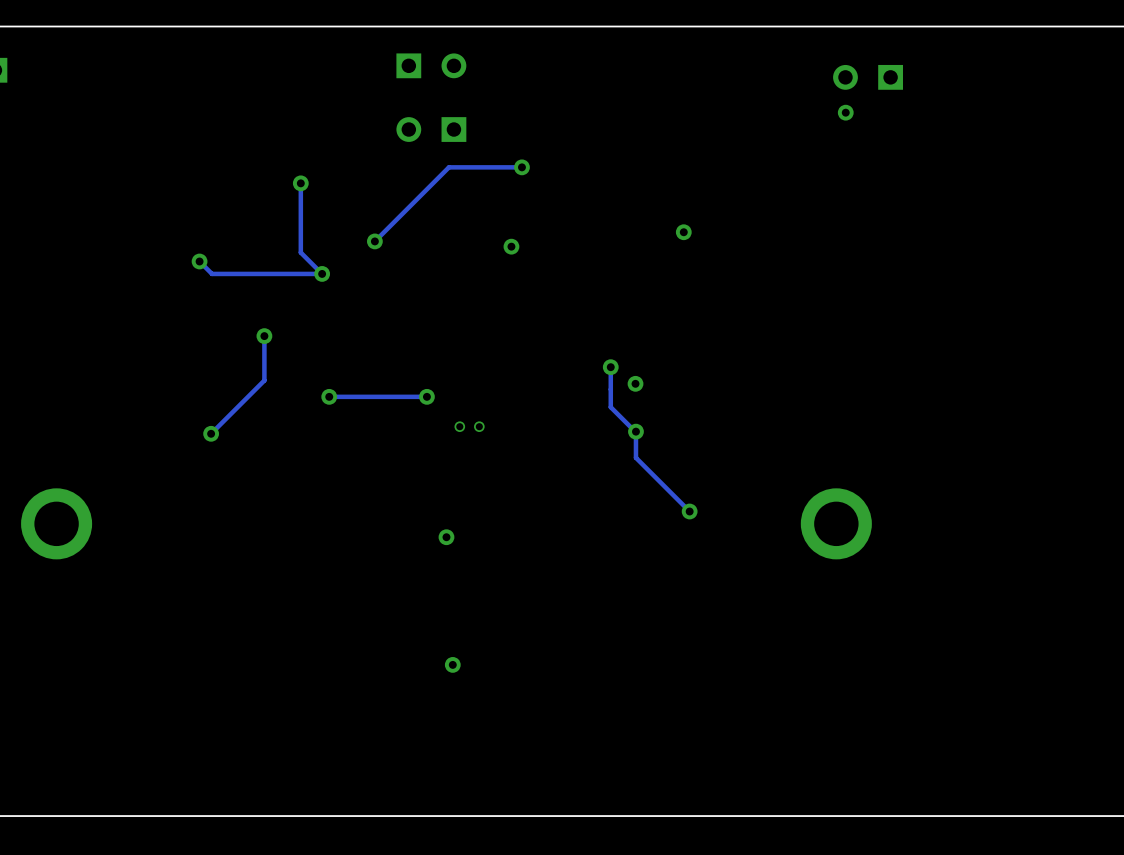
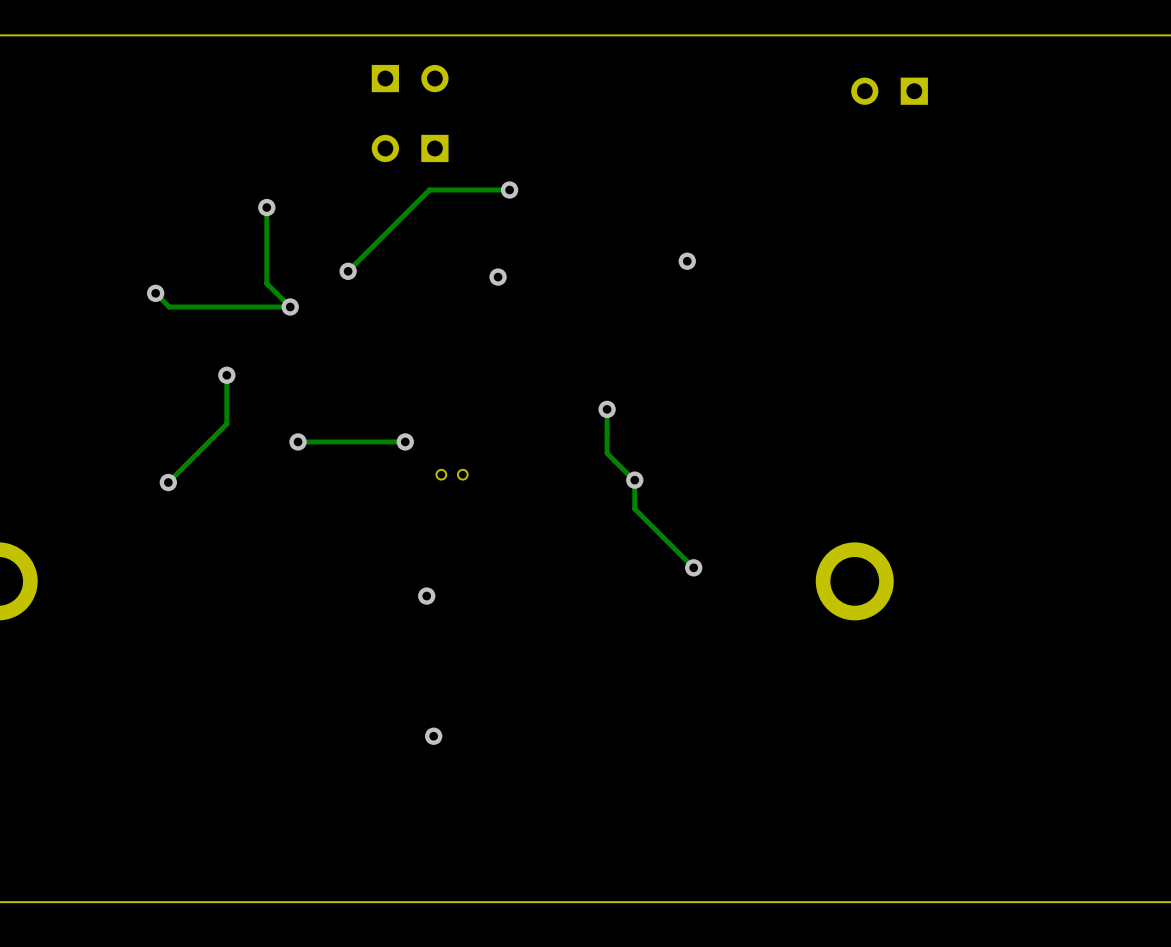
via: (845, 112) -> none
via: (635, 383) -> none

